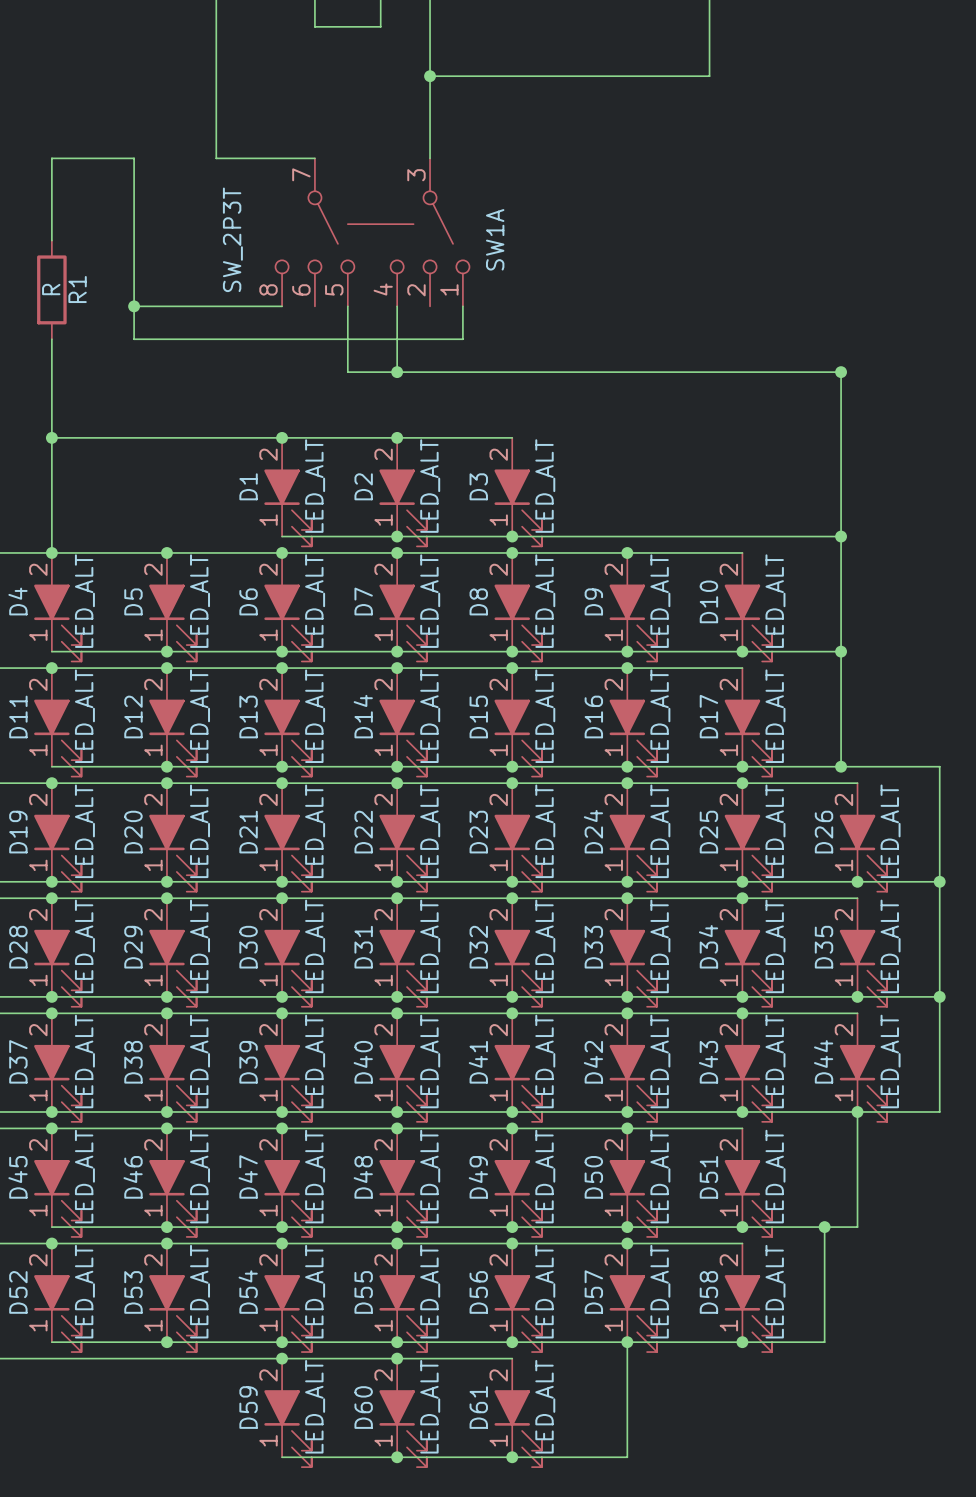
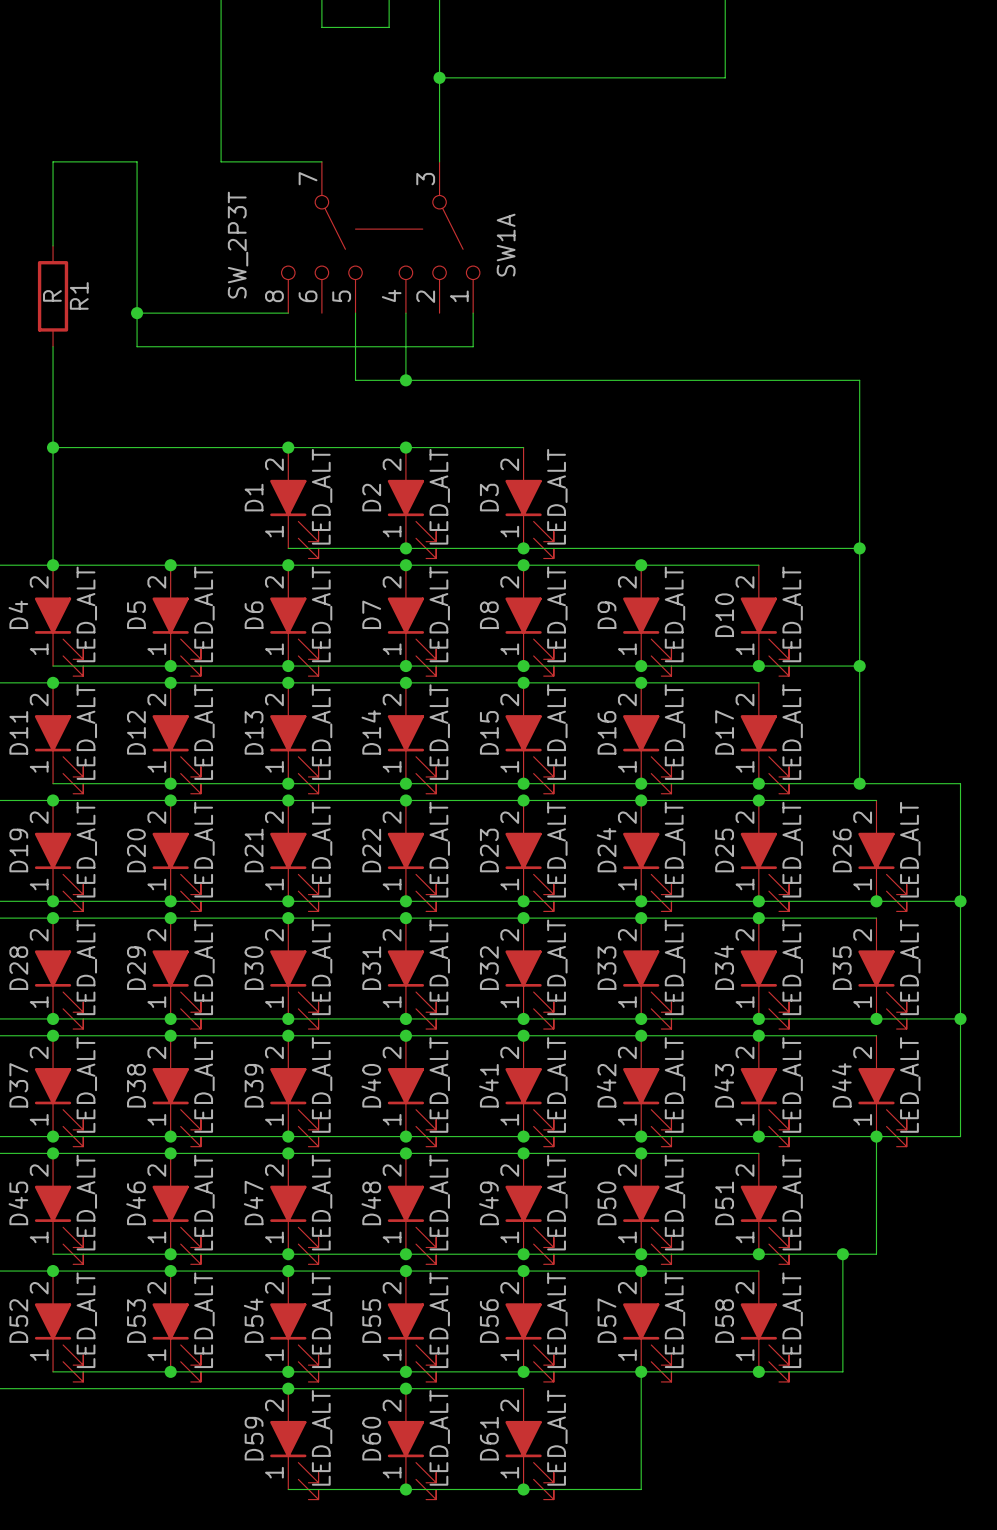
junction: (841, 372) -> none

